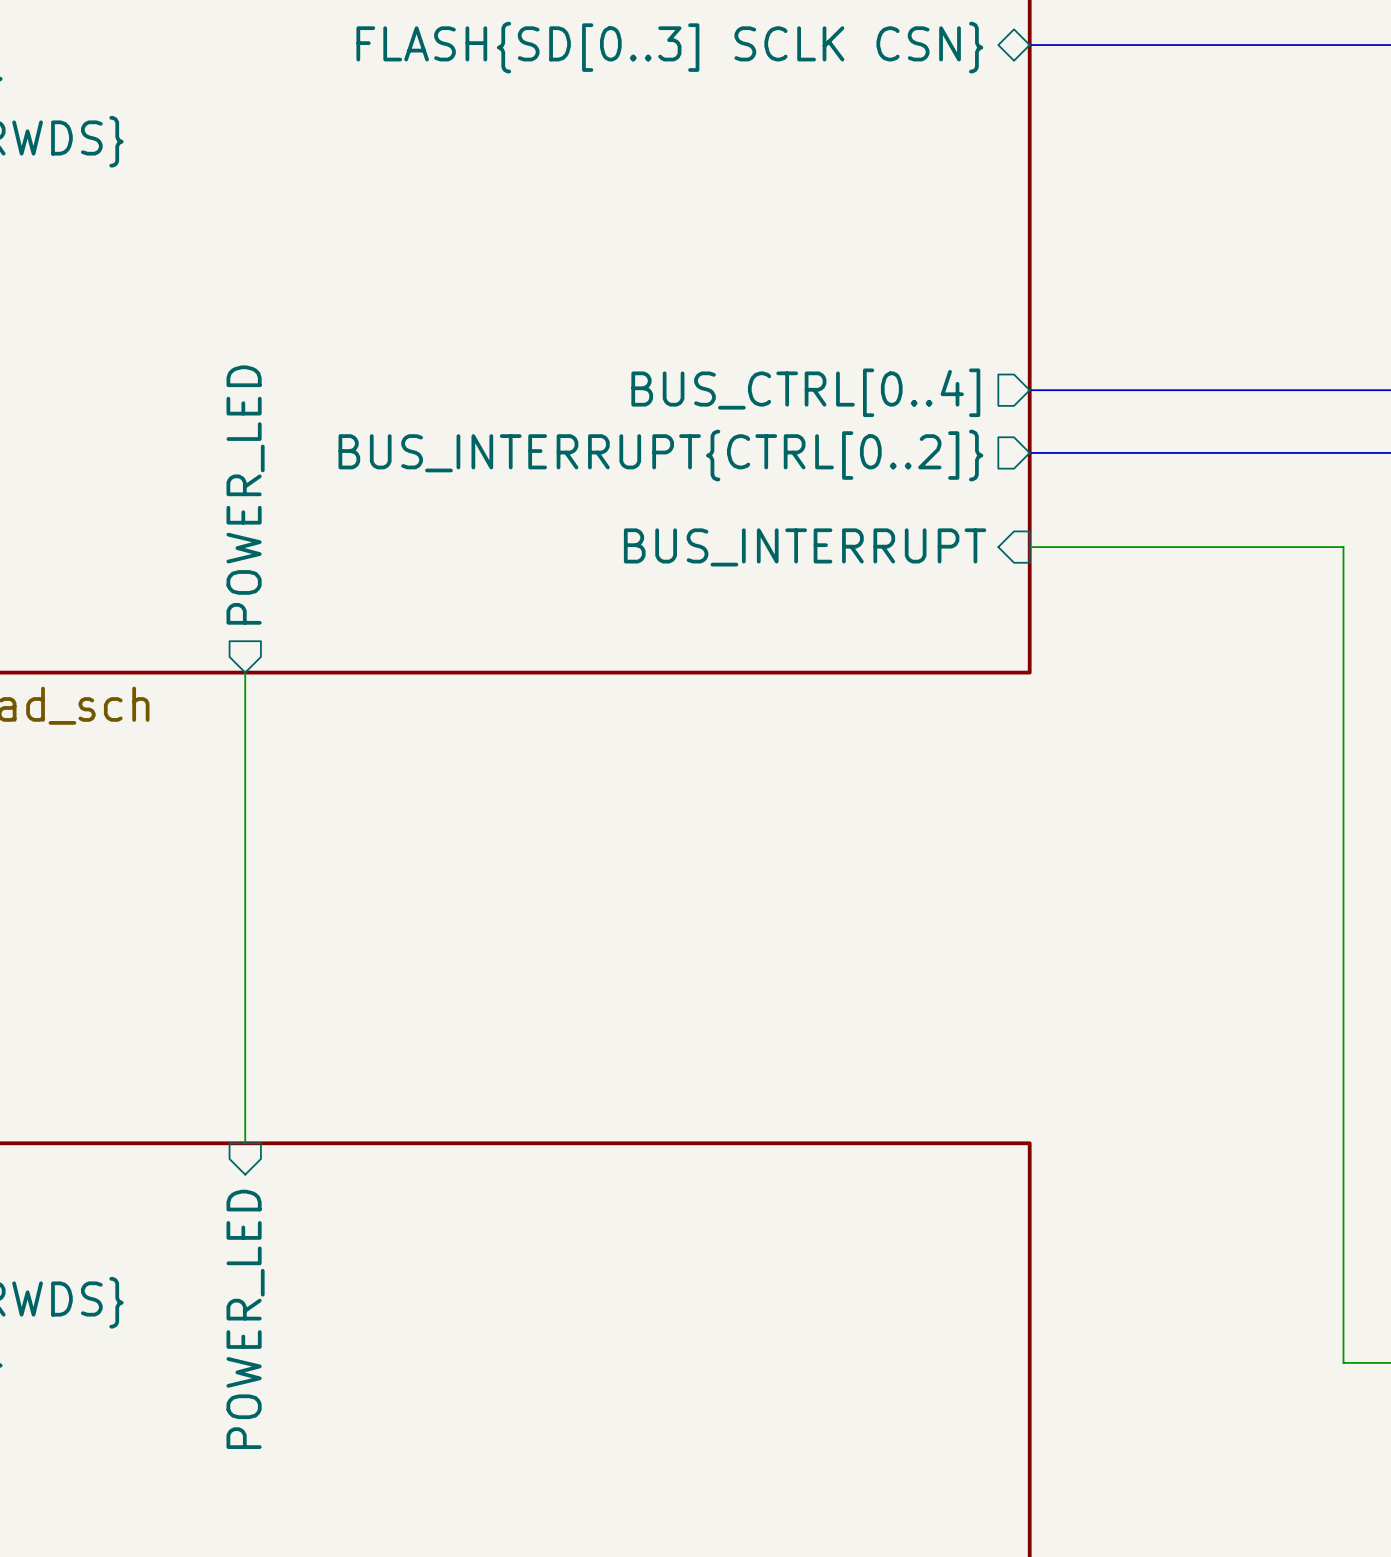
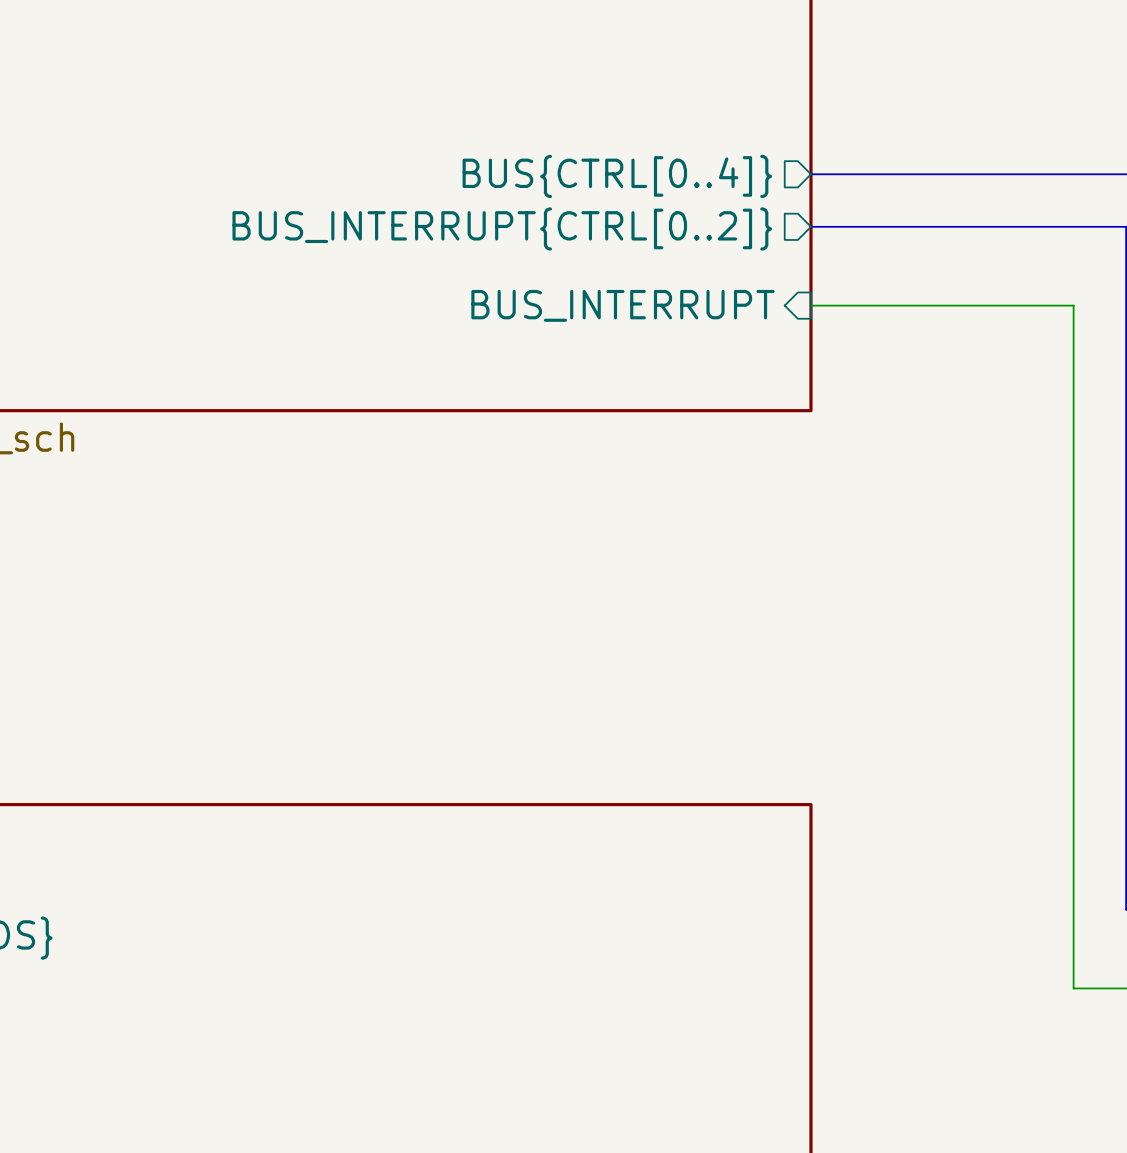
sheet pin: BUS_CTRL[0..4] (805, 392) -> BUS{CTRL[0..4]} (617, 176)
sheet pin: POWER_LED (245, 495) -> none
wire: (245, 672) (245, 1143) -> none
sheet pin: POWER_LED (245, 1319) -> none

